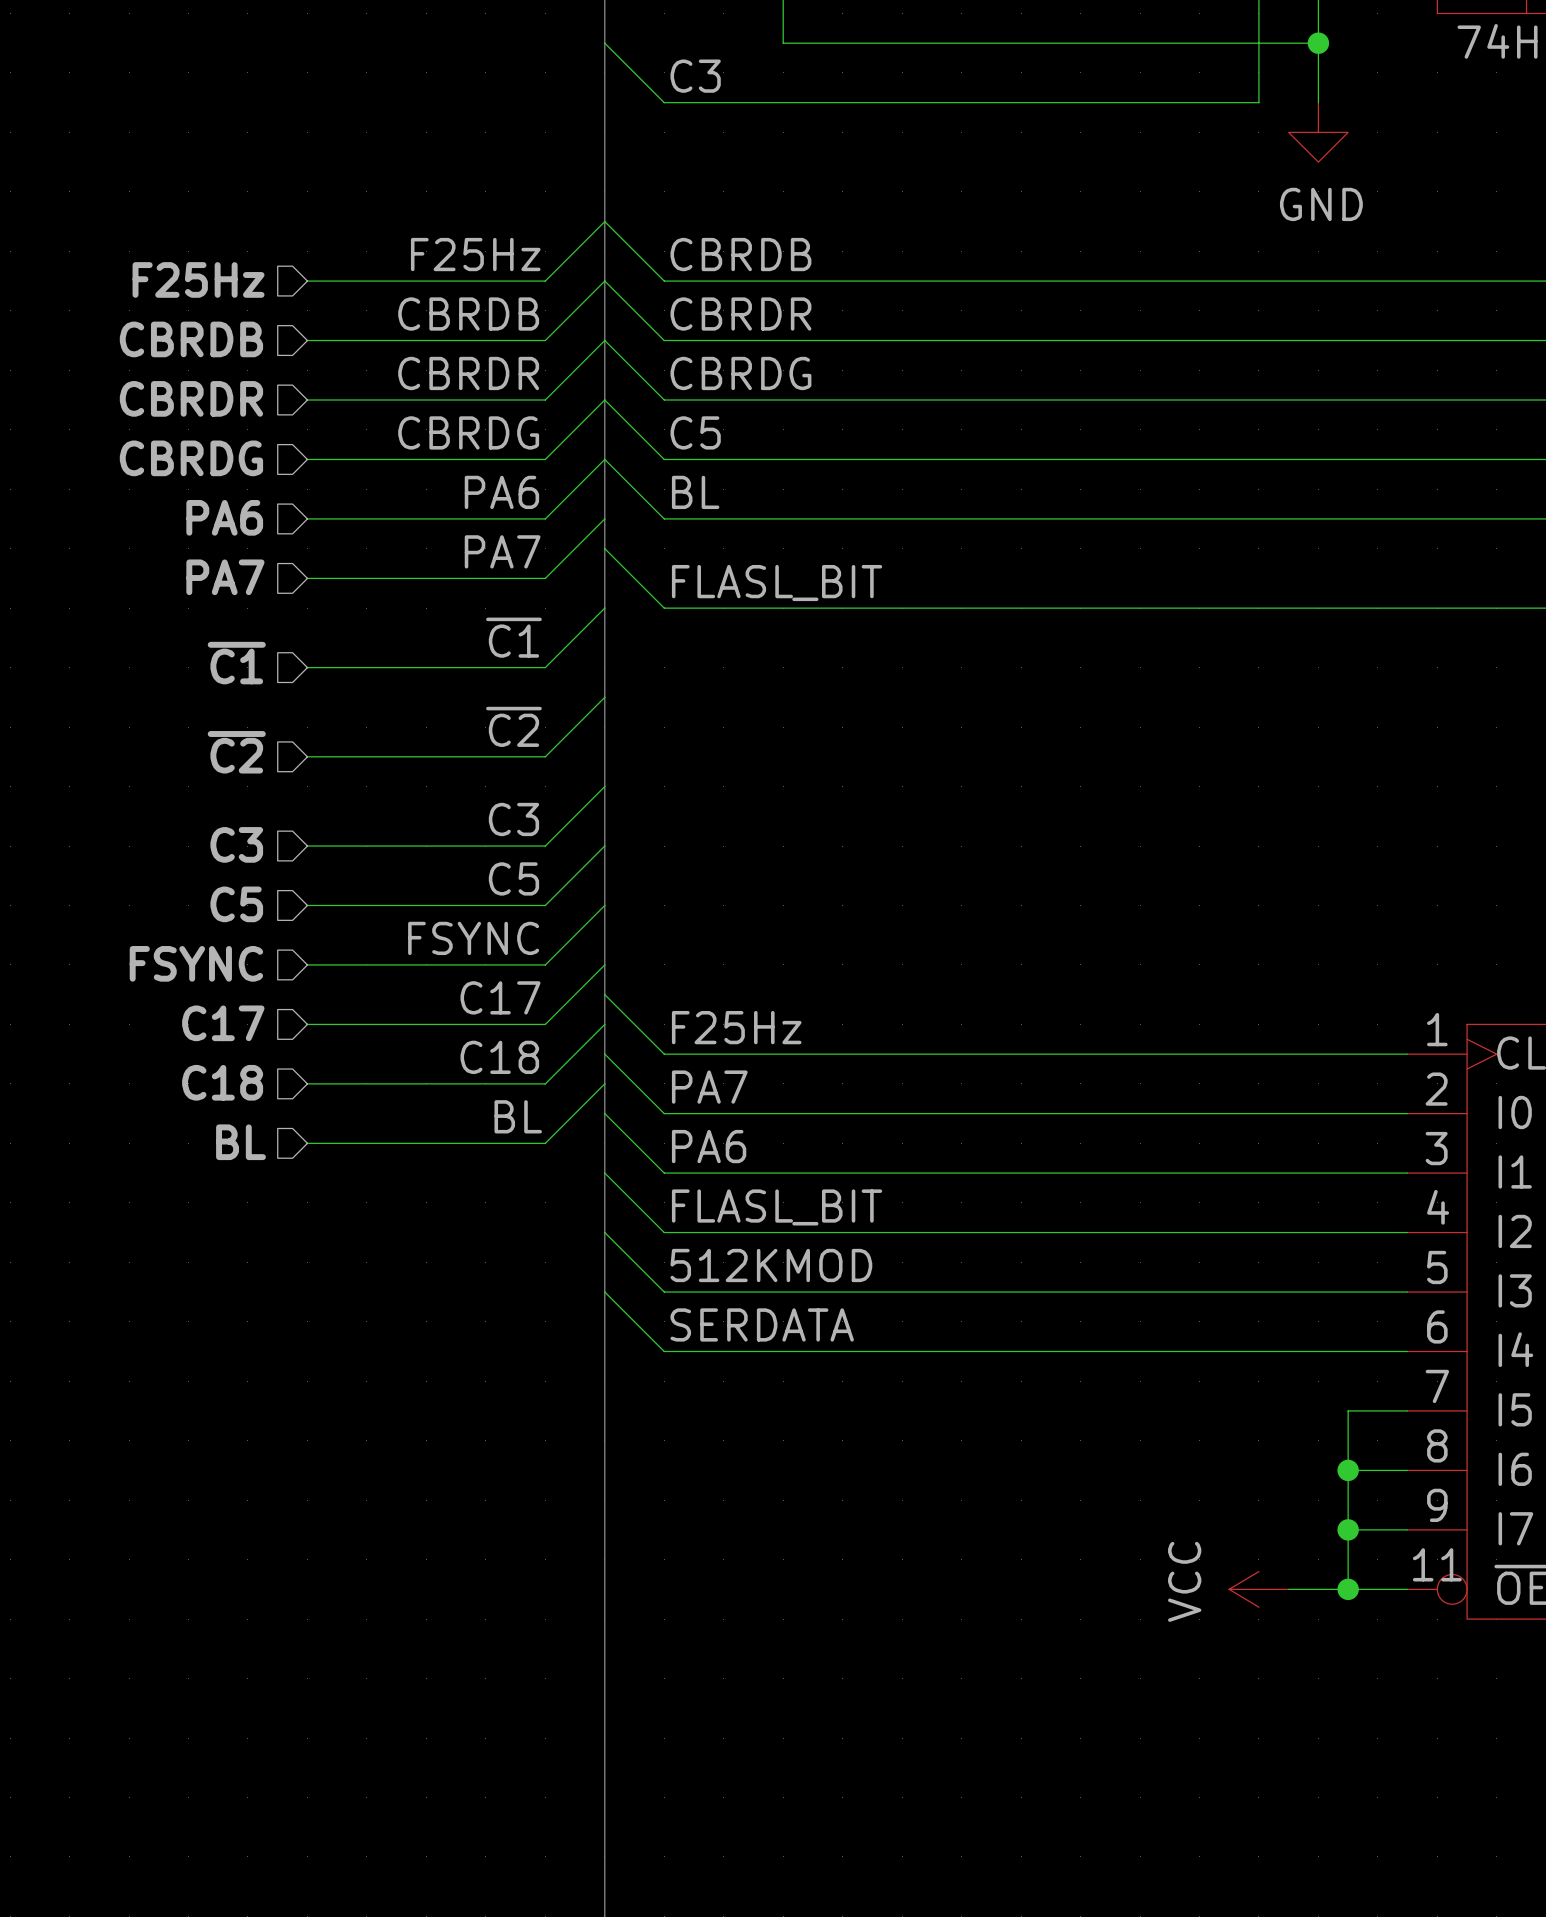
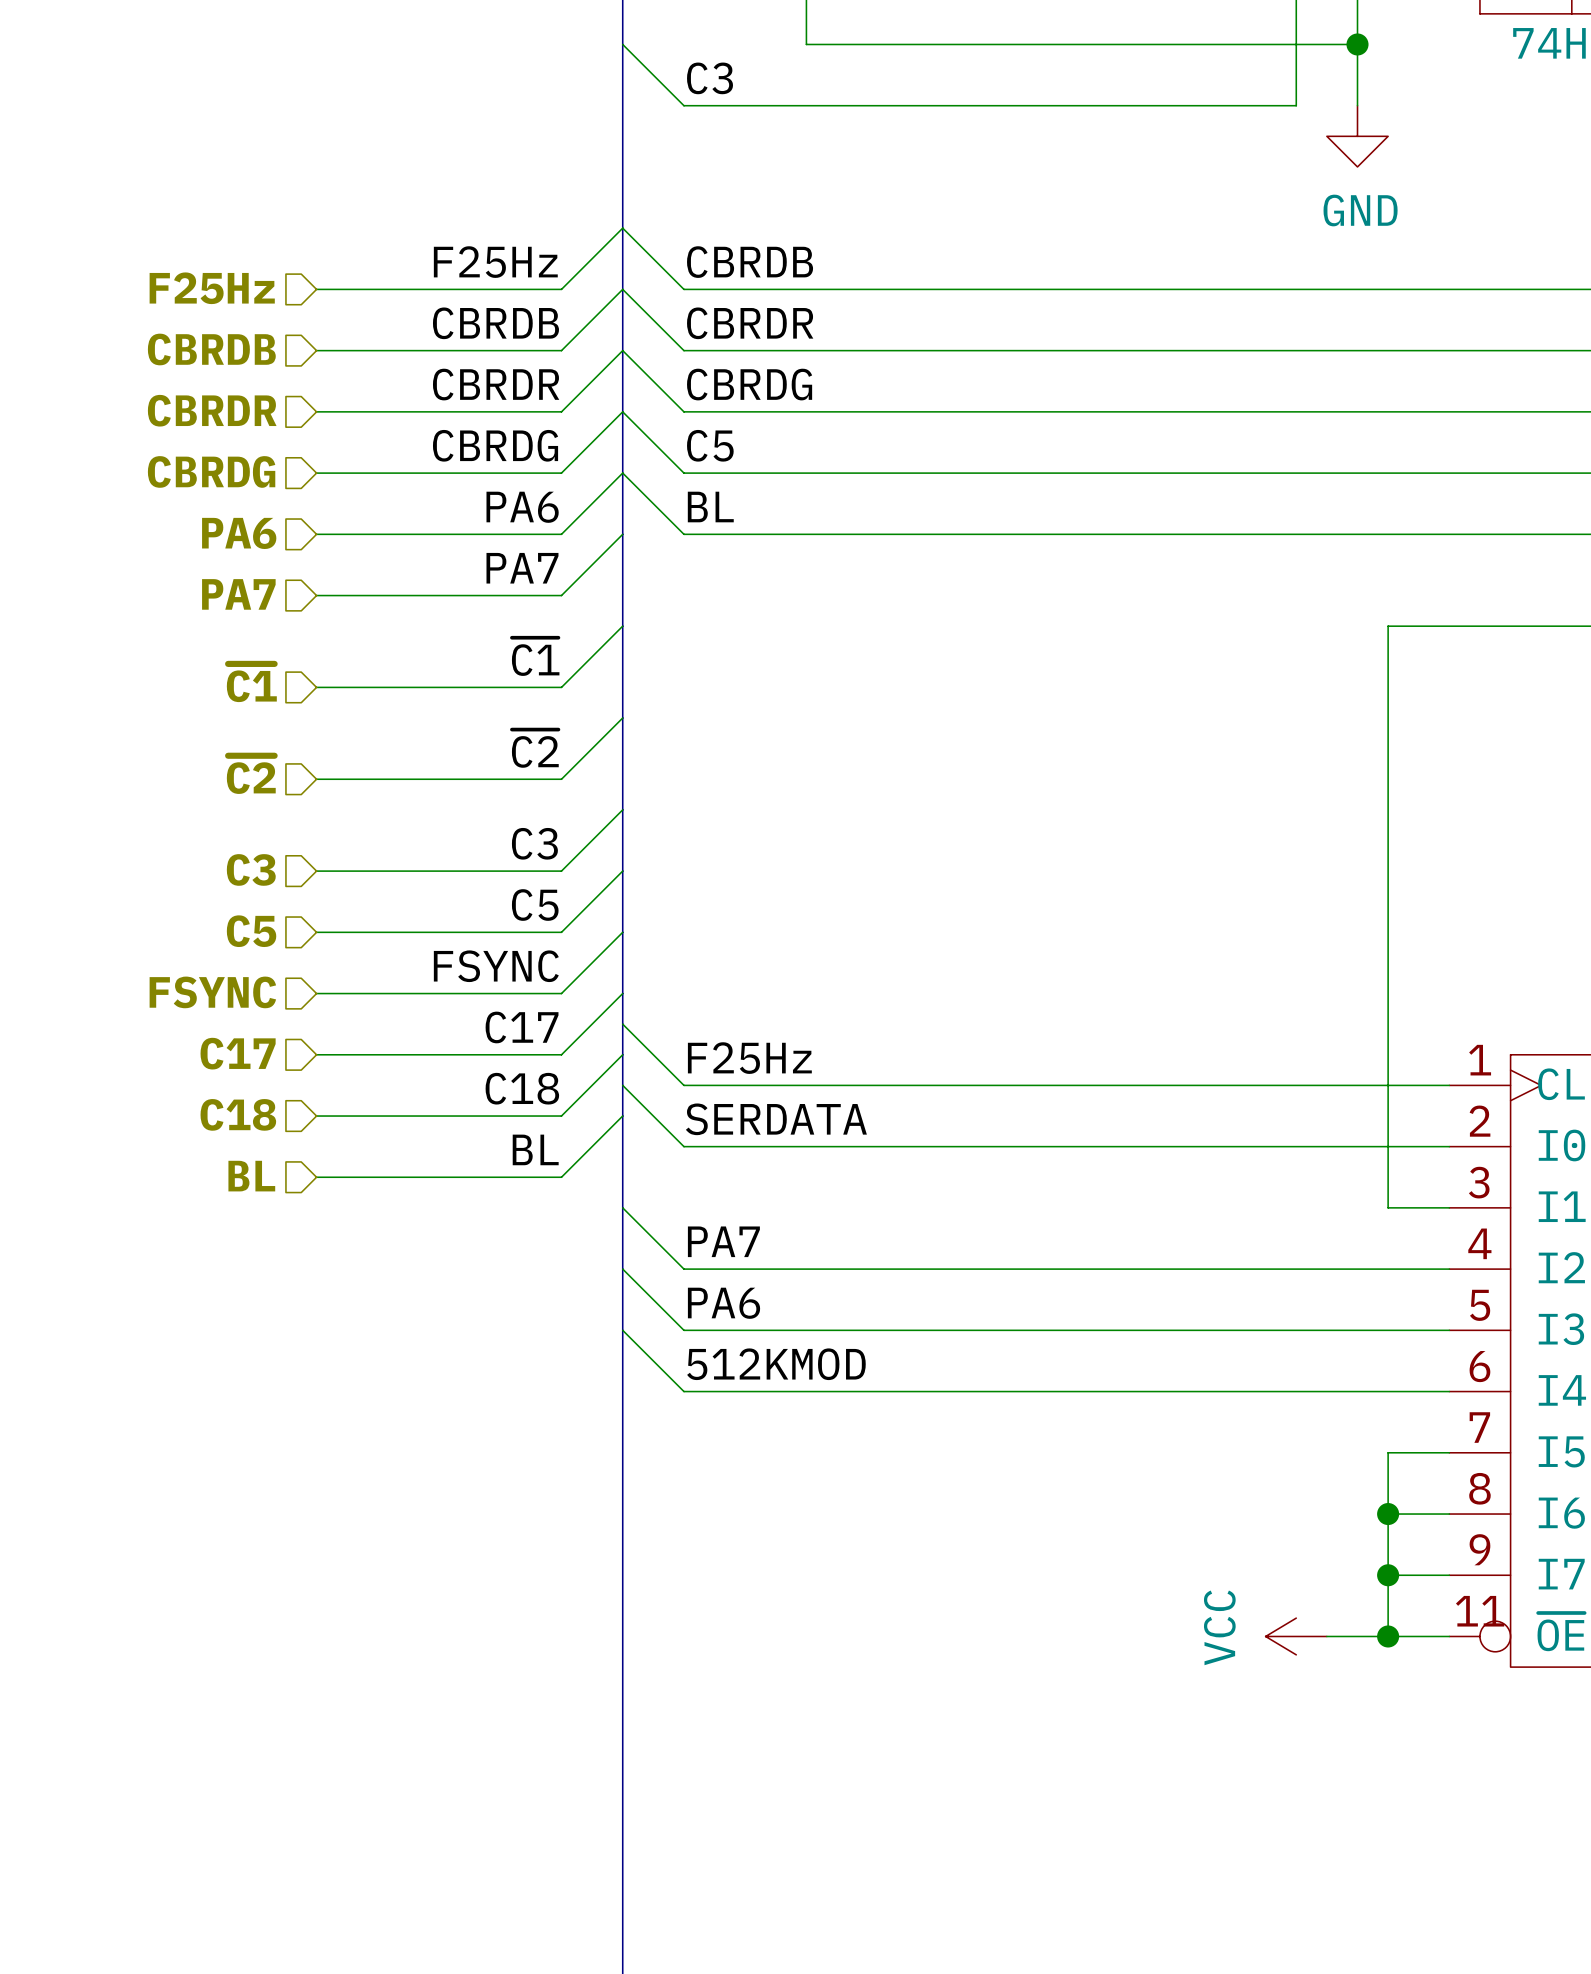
wire: (604, 548) (664, 608) (1348, 608) -> none
label: FLASL_BIT (777, 583) -> none
label: PA7 (709, 1087) -> SERDATA (776, 1119)
wire: (604, 1113) (664, 1173) (1348, 1173) -> (1388, 626) (1388, 1207)
label: PA6 (709, 1146) -> none
label: FLASL_BIT (777, 1207) -> PA7 (723, 1241)
label: 512KMOD (771, 1265) -> PA6 (724, 1303)
label: SERDATA (762, 1324) -> 512KMOD (776, 1364)

